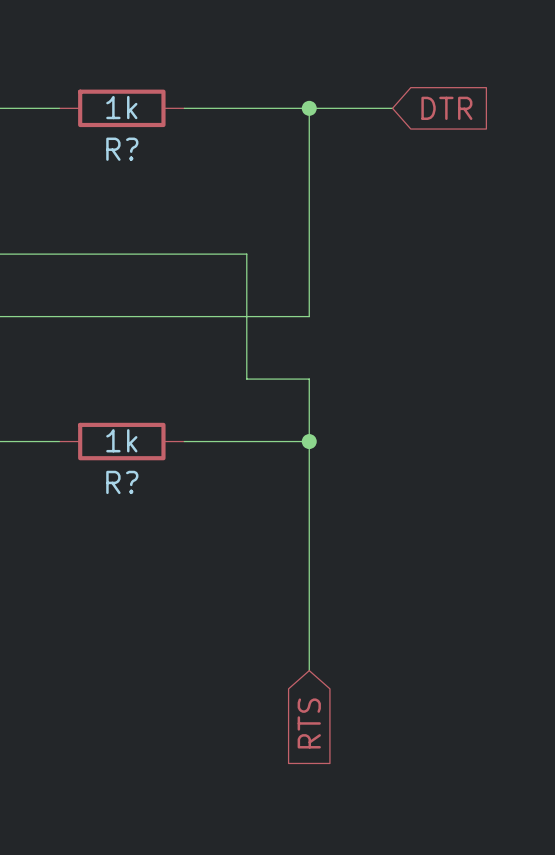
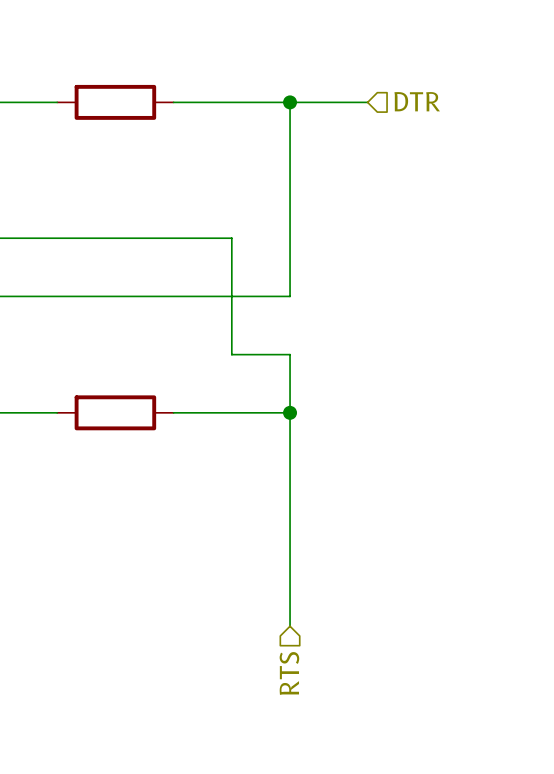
R? value: 1k (121, 107) -> none
hierarchical label: none -> DTR (417, 101)
global label: DTR (446, 108) -> none
R? name: R? (122, 149) -> none
R? value: 1k (121, 440) -> none
R? name: R? (122, 482) -> none
global label: RTS (309, 723) -> none
hierarchical label: none -> RTS (289, 673)

